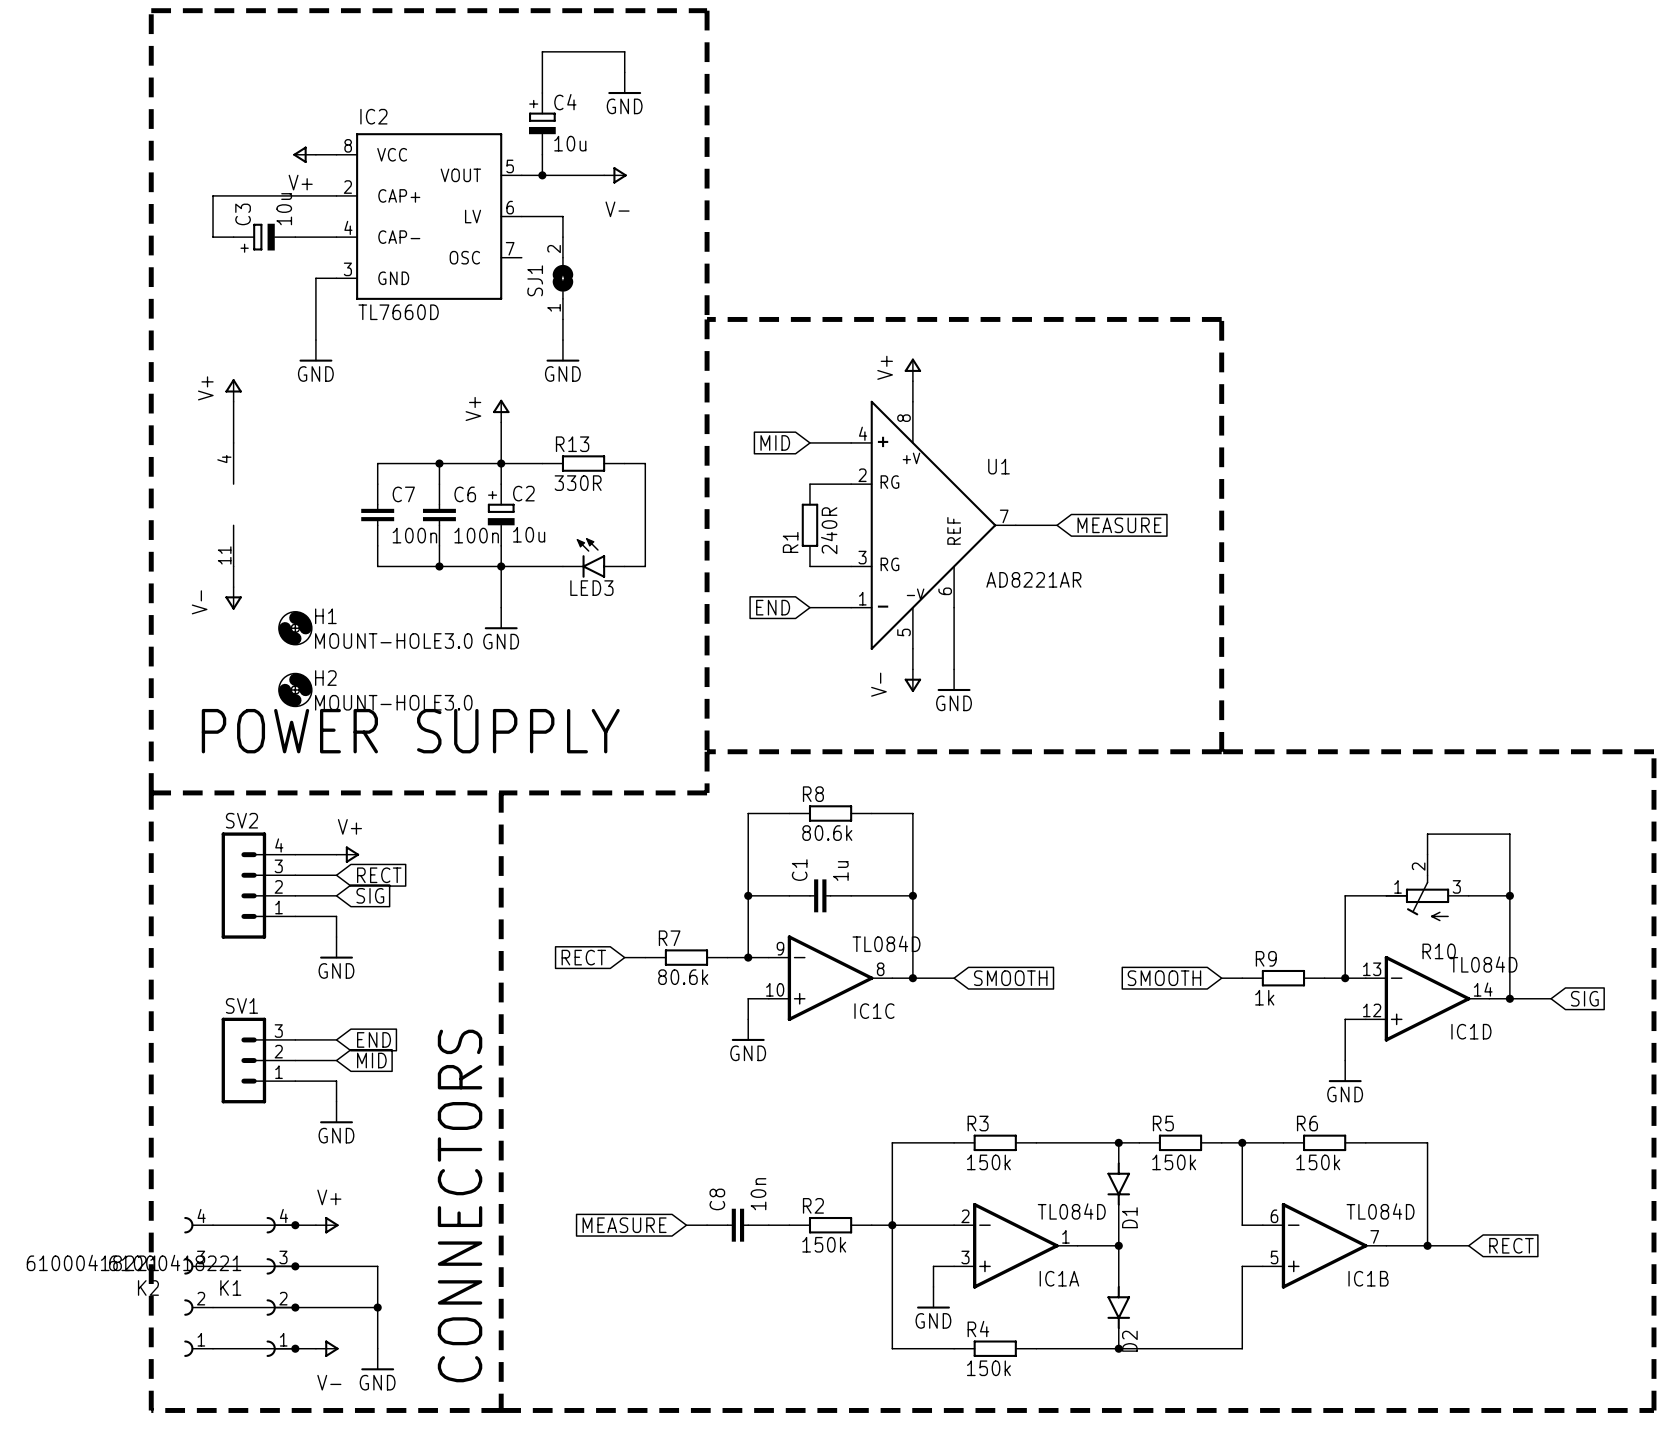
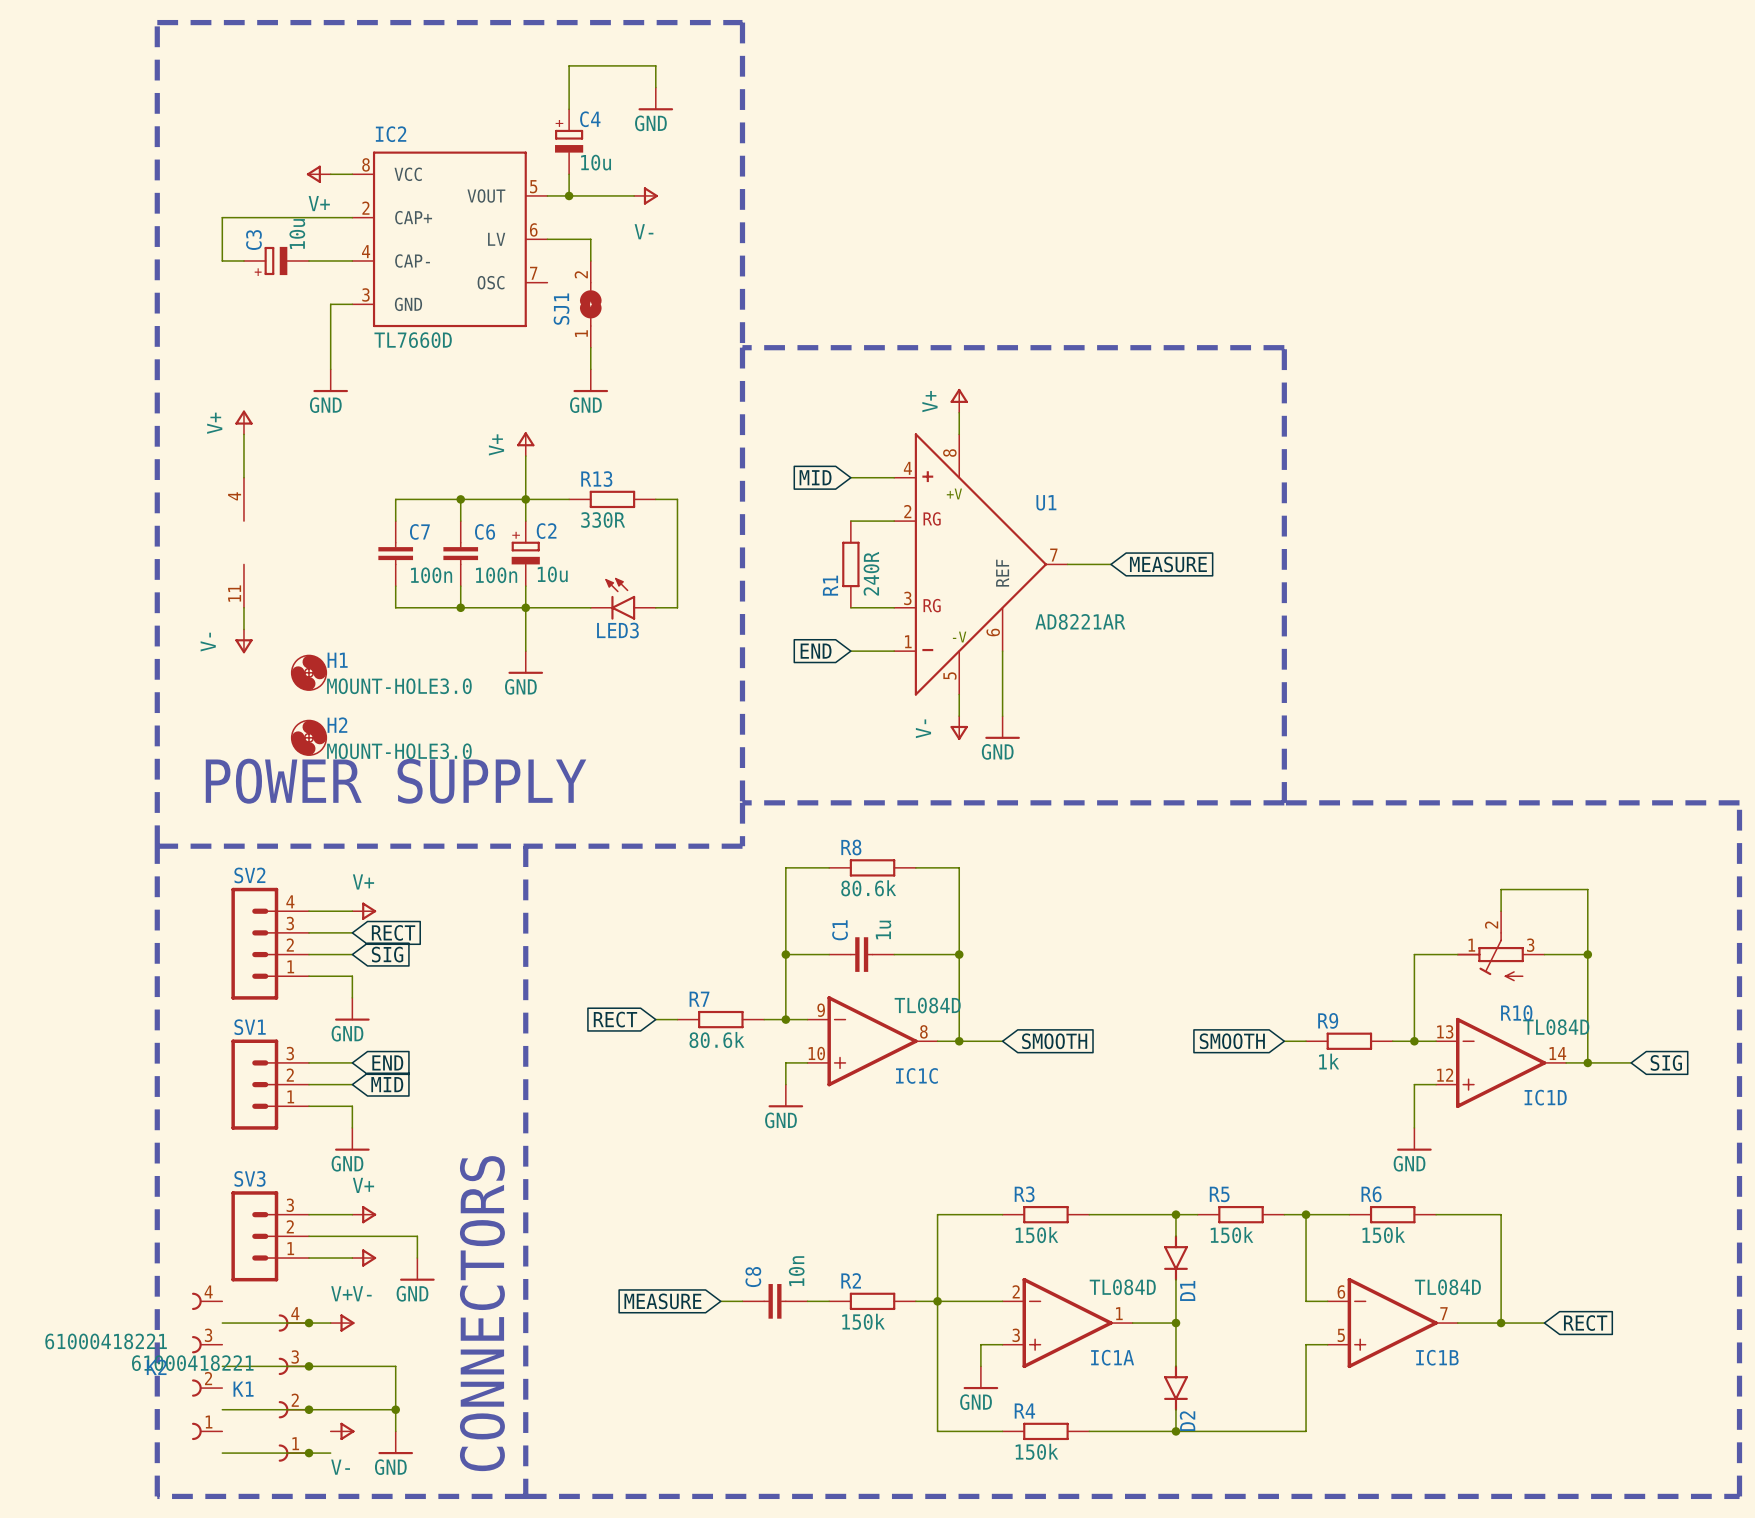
wire: none -> (309, 1062) (352, 1062)
wire: none -> (309, 1084) (352, 1084)
global label position: END (374, 1039) -> END (387, 1062)
SV1 position: (258, 1060) -> (270, 1084)
wire: (295, 1060) (336, 1060) -> (352, 1106) (352, 1127)
global label position: MID (371, 1060) -> MID (387, 1084)
wire: (295, 1081) (336, 1081) (336, 1101) -> none
power symbol position: GND (336, 1112) -> GND (352, 1139)
wire: none -> (309, 1214) (352, 1214)
power symbol: none -> V+ (364, 1214)
SV3: none -> (270, 1236)
wire: none -> (309, 1236) (417, 1236) (417, 1258)
wire: none -> (309, 1258) (352, 1258)
power symbol: none -> V- (364, 1258)
power symbol: none -> GND (417, 1269)
wire: (213, 1225) (315, 1225) -> (222, 1323) (330, 1323)
junction: (295, 1225) -> none
power symbol position: V+ (327, 1225) -> V+ (342, 1323)
junction: none -> (309, 1323)
wire: (213, 1266) (377, 1266) (377, 1286) -> (222, 1366) (395, 1366)
junction: (295, 1266) -> none
K1 position: (280, 1286) -> (293, 1388)
junction: none -> (309, 1366)
wire: (213, 1307) (377, 1307) -> (222, 1409) (395, 1409)
junction: (295, 1307) -> none
junction position: (377, 1307) -> (395, 1409)
junction: none -> (309, 1409)
wire: (213, 1348) (315, 1348) -> (222, 1453) (330, 1453)
junction: (295, 1348) -> none
junction: none -> (309, 1453)

